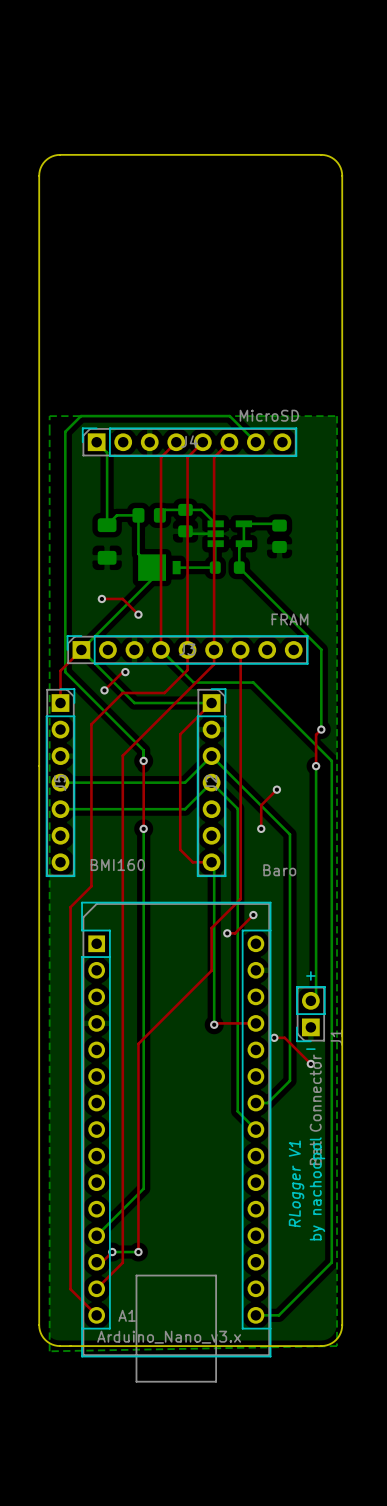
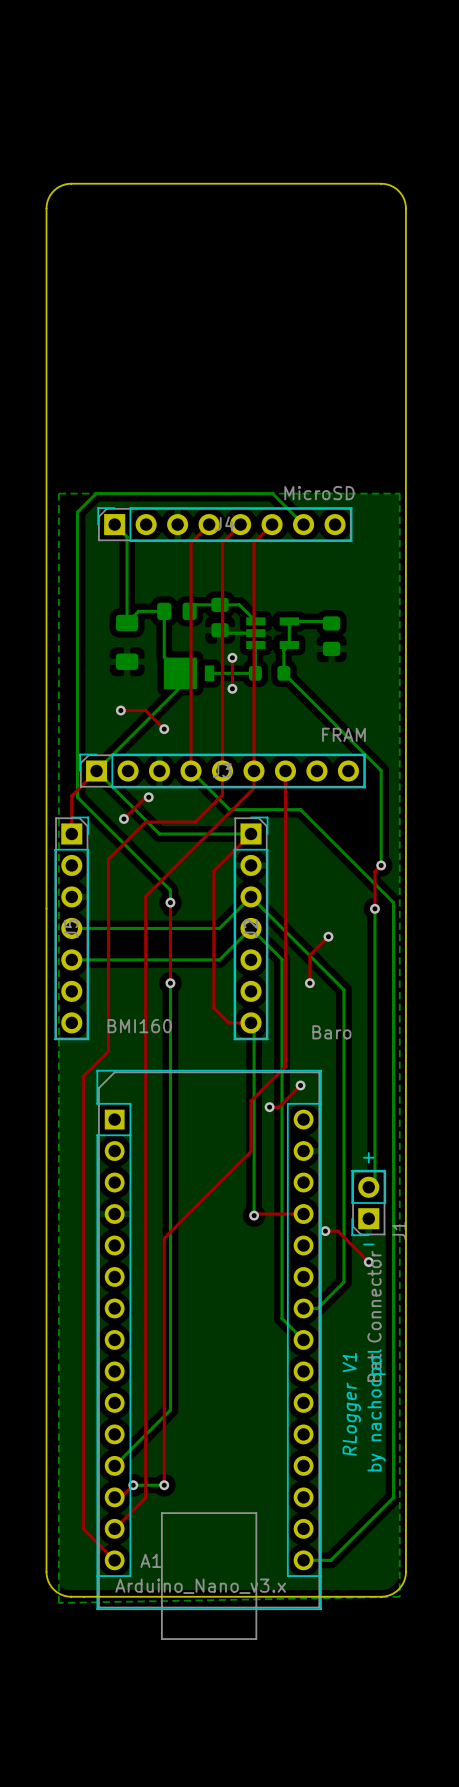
top track: none -> (232, 657) (232, 688)
via: none -> (232, 657)
via: none -> (232, 688)

